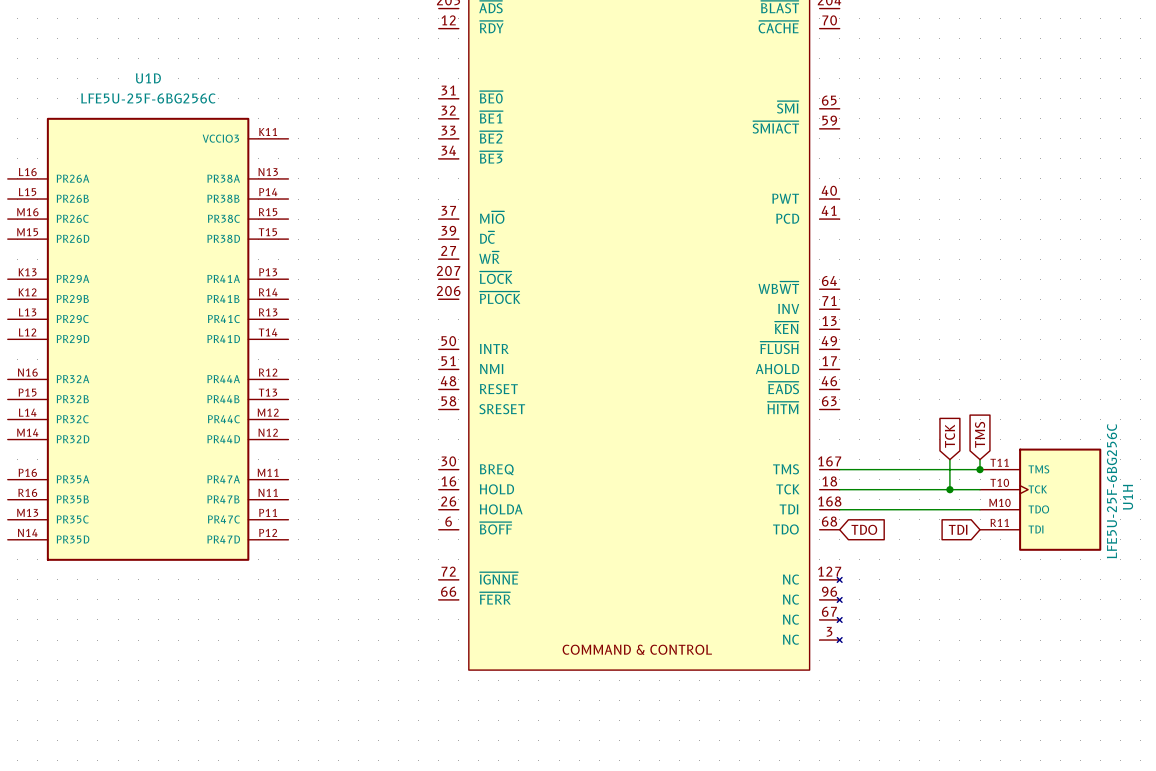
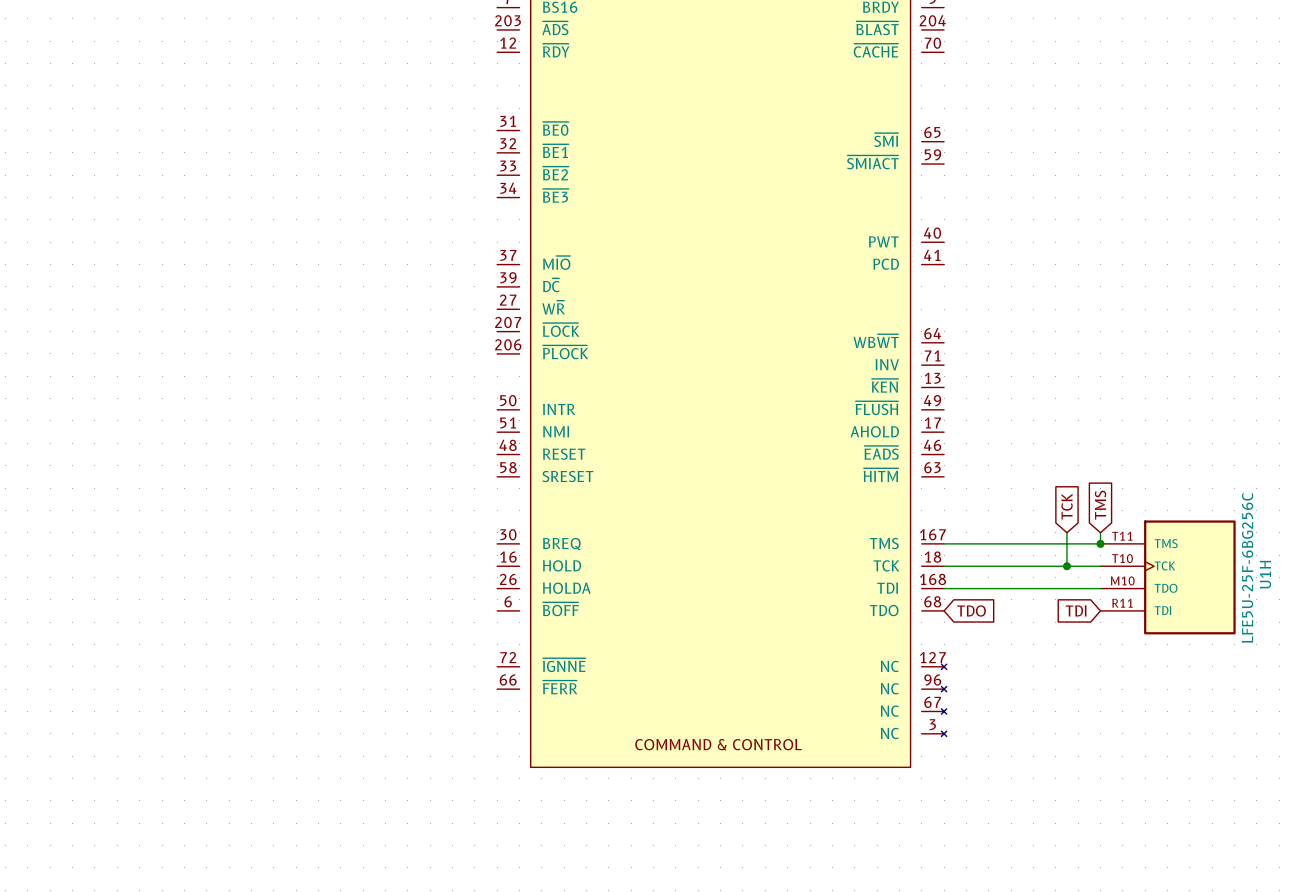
U1D: LFE5U-25F-6BG256C (148, 339) -> none

